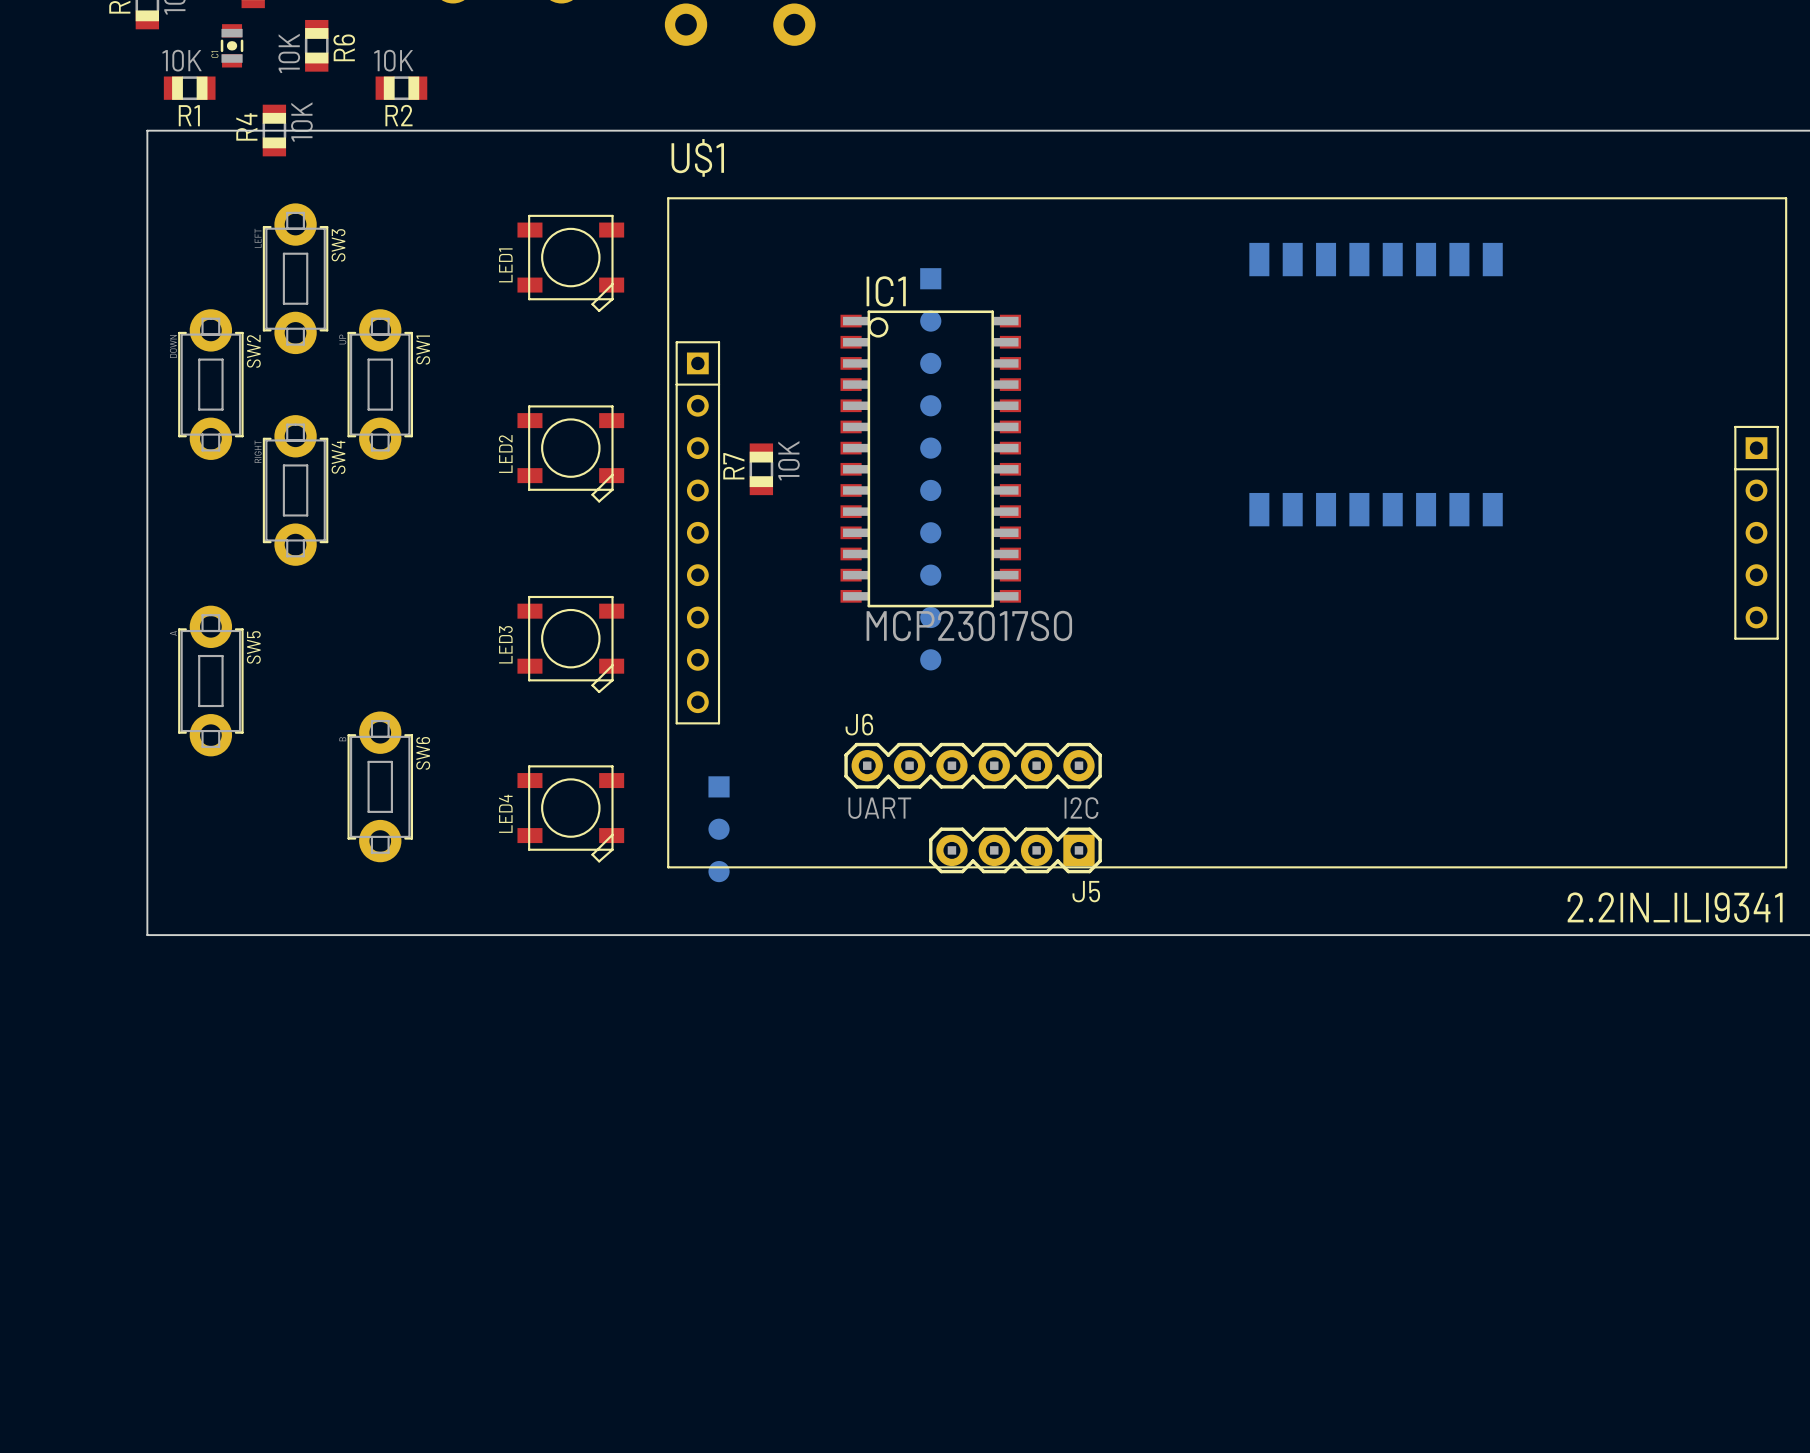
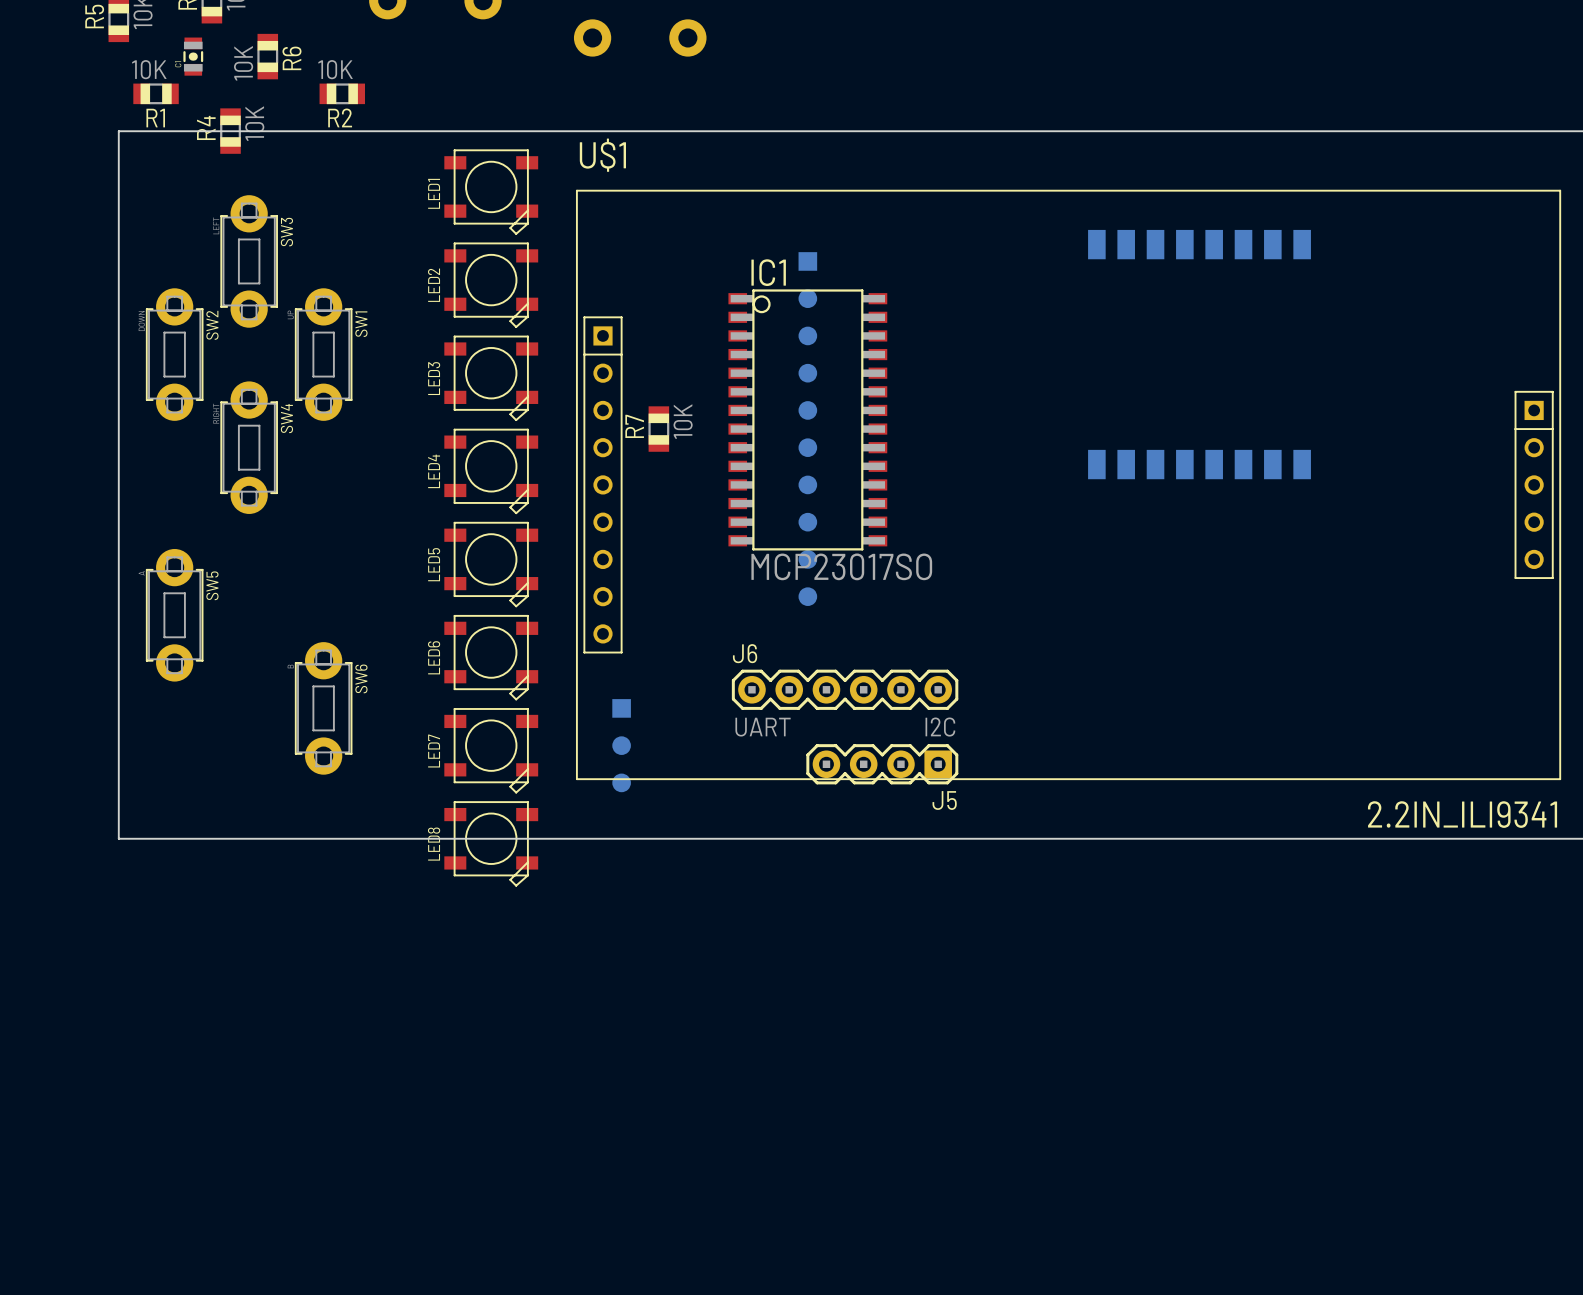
LED1 position: (570, 263) -> (491, 192)
LED2 position: (570, 453) -> (491, 285)
LED5: none -> (491, 564)
LED3 position: (570, 644) -> (491, 378)
LED6: none -> (491, 657)
LED4 position: (570, 813) -> (491, 471)
LED7: none -> (491, 750)
LED8: none -> (491, 843)

